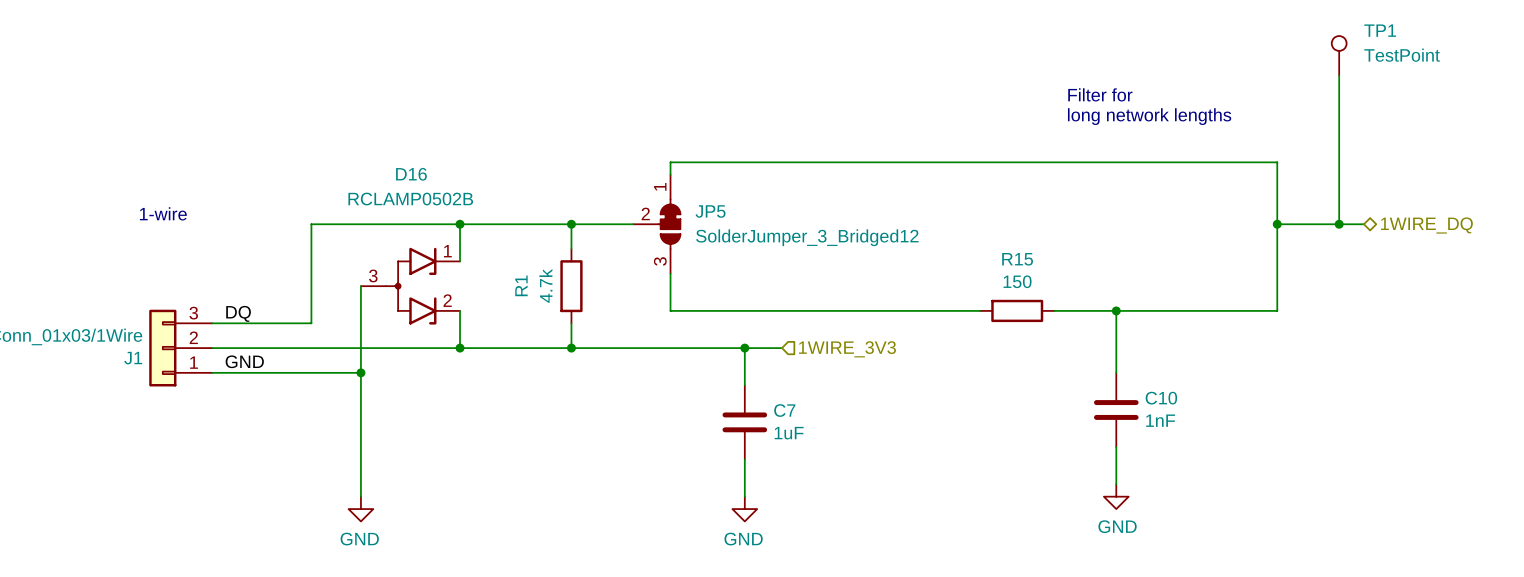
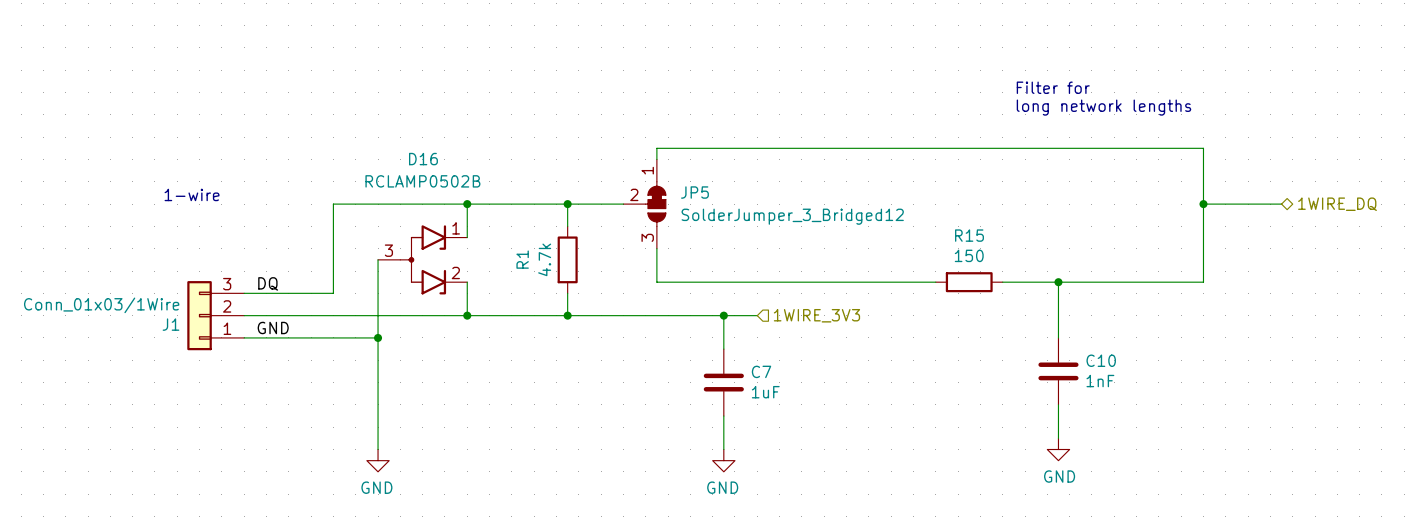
TP1: TestPoint (1339, 55) -> none
wire: (1339, 75) (1339, 224) -> none
junction: (1339, 224) -> none

